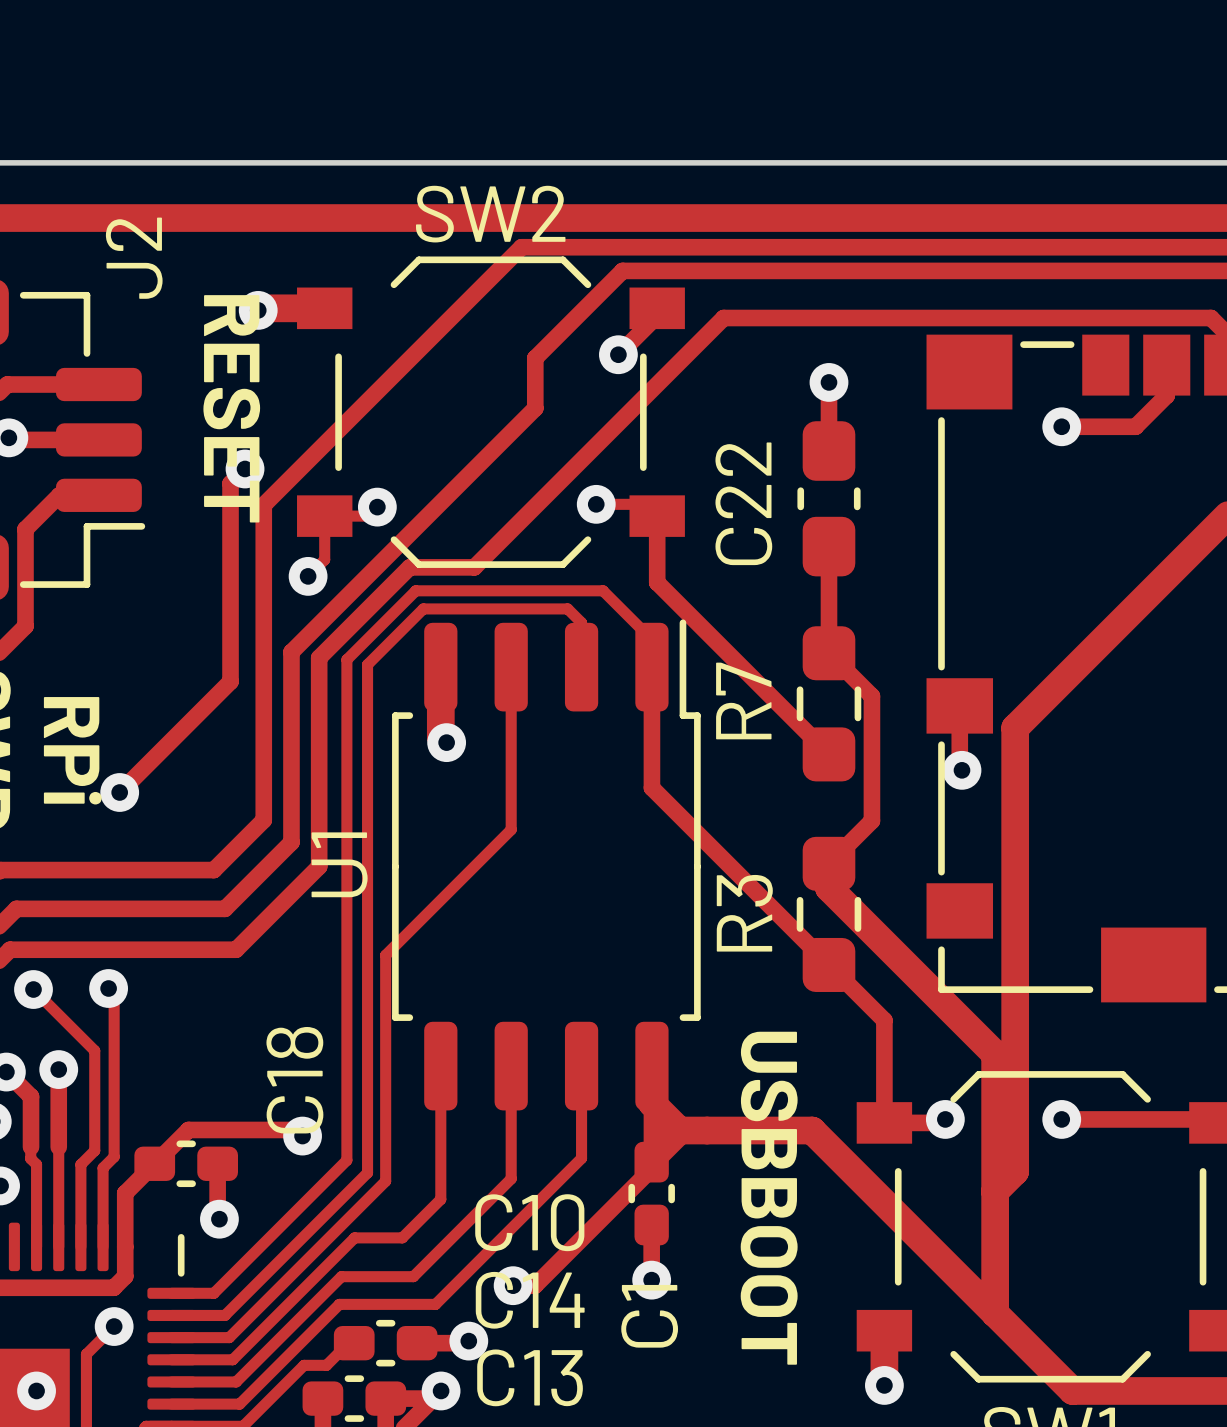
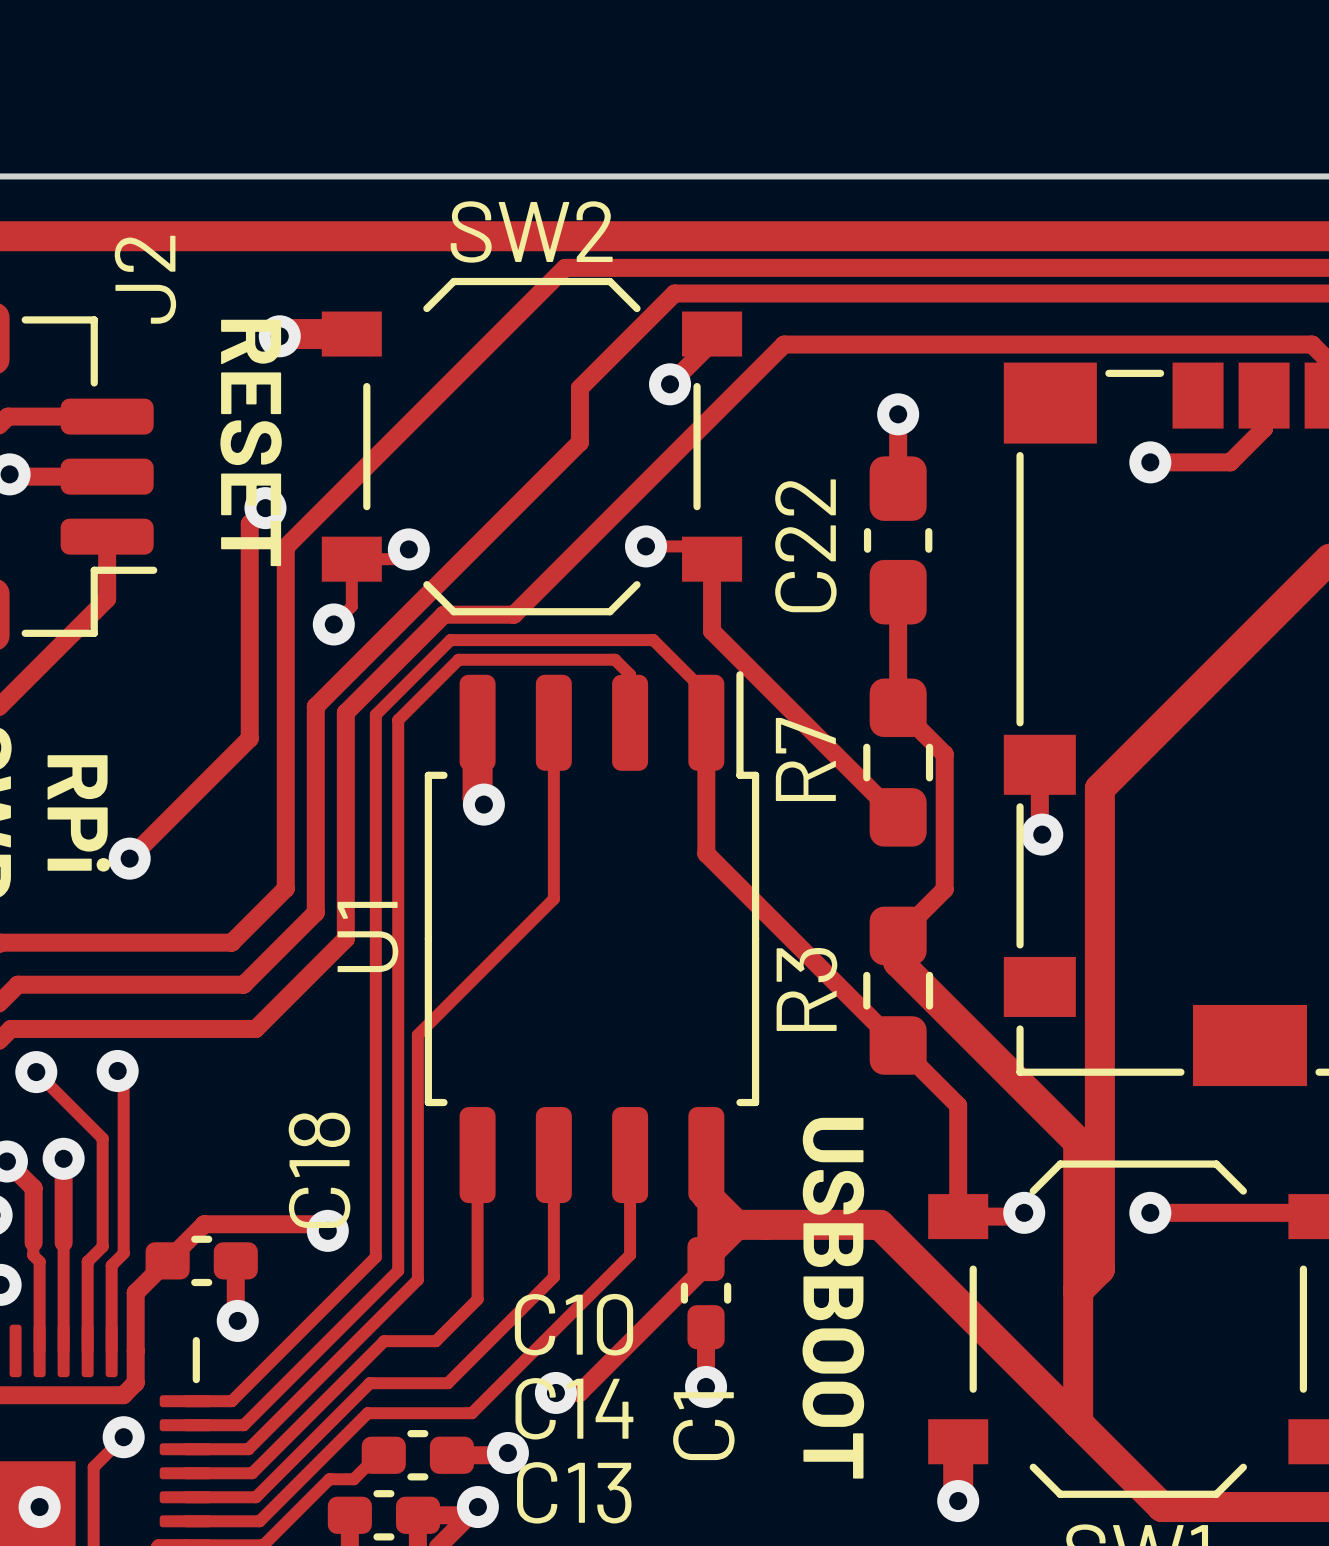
track: (98, 495) (59, 495) (25, 529) (25, 626) -> (107, 536) (107, 598) (27, 678)

